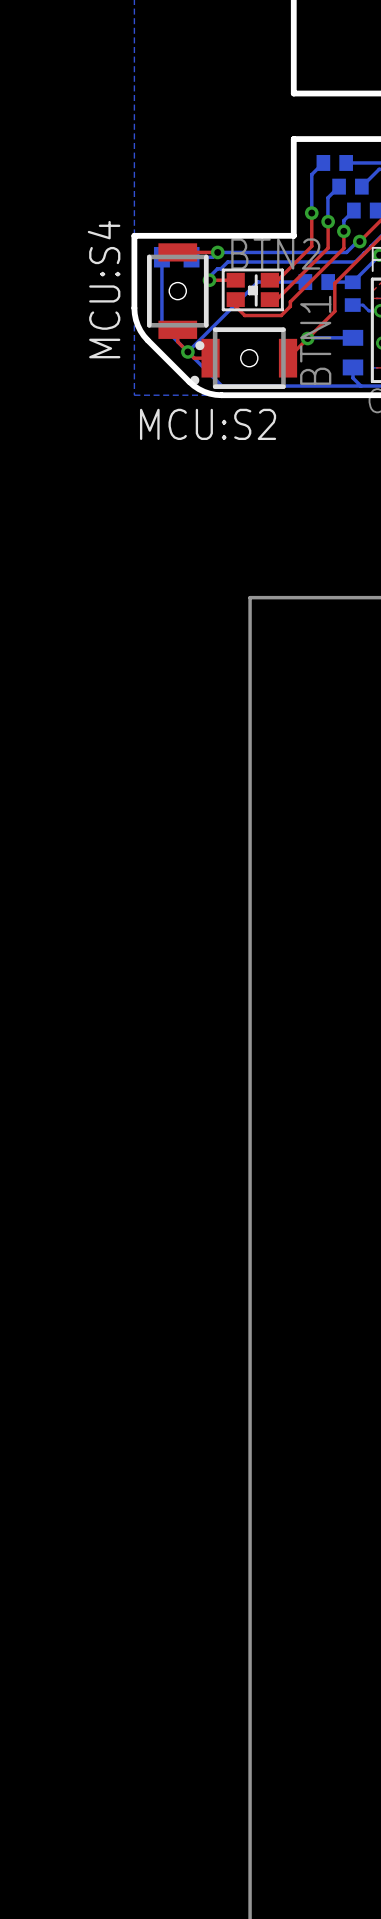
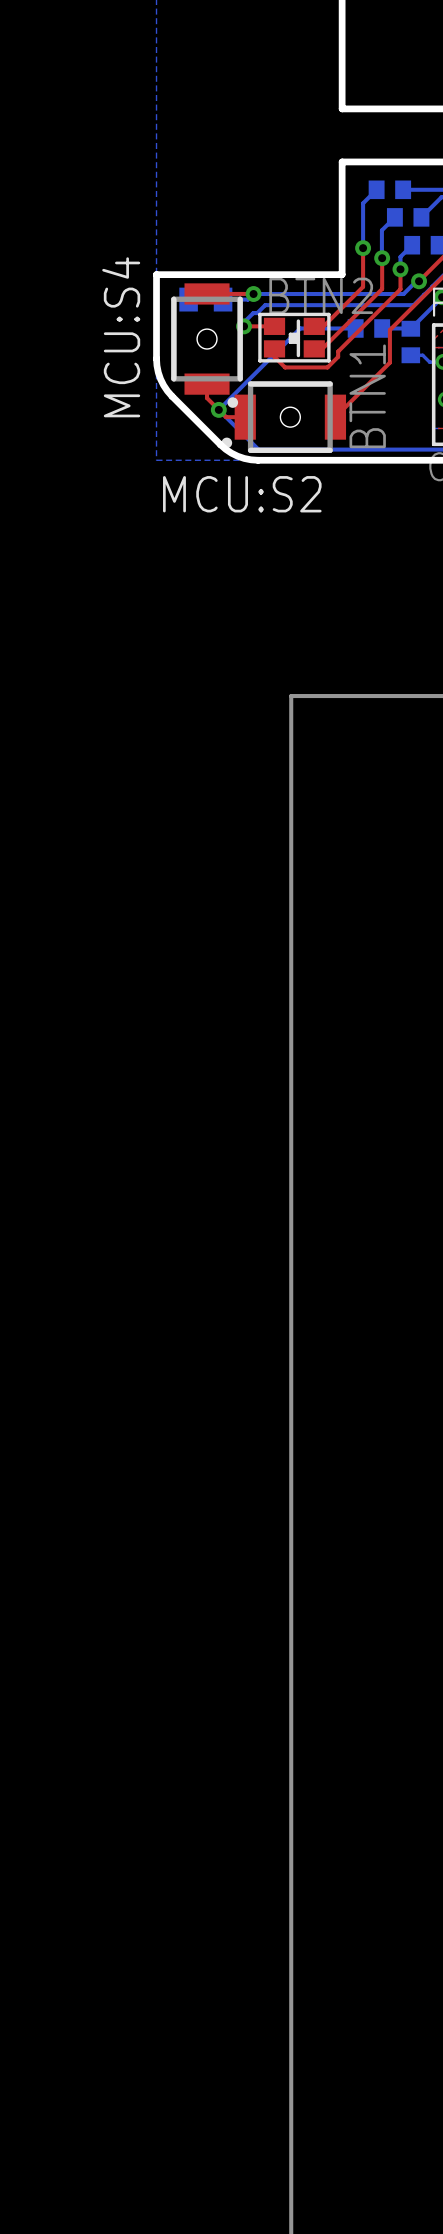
bottom track: (161, 257) (161, 326) (187, 351) -> none
bottom track: (352, 337) (307, 338) -> none
via: (307, 338) -> none
part: (352, 352) -> none
bottom track: (352, 367) (352, 378) (360, 386) -> none

